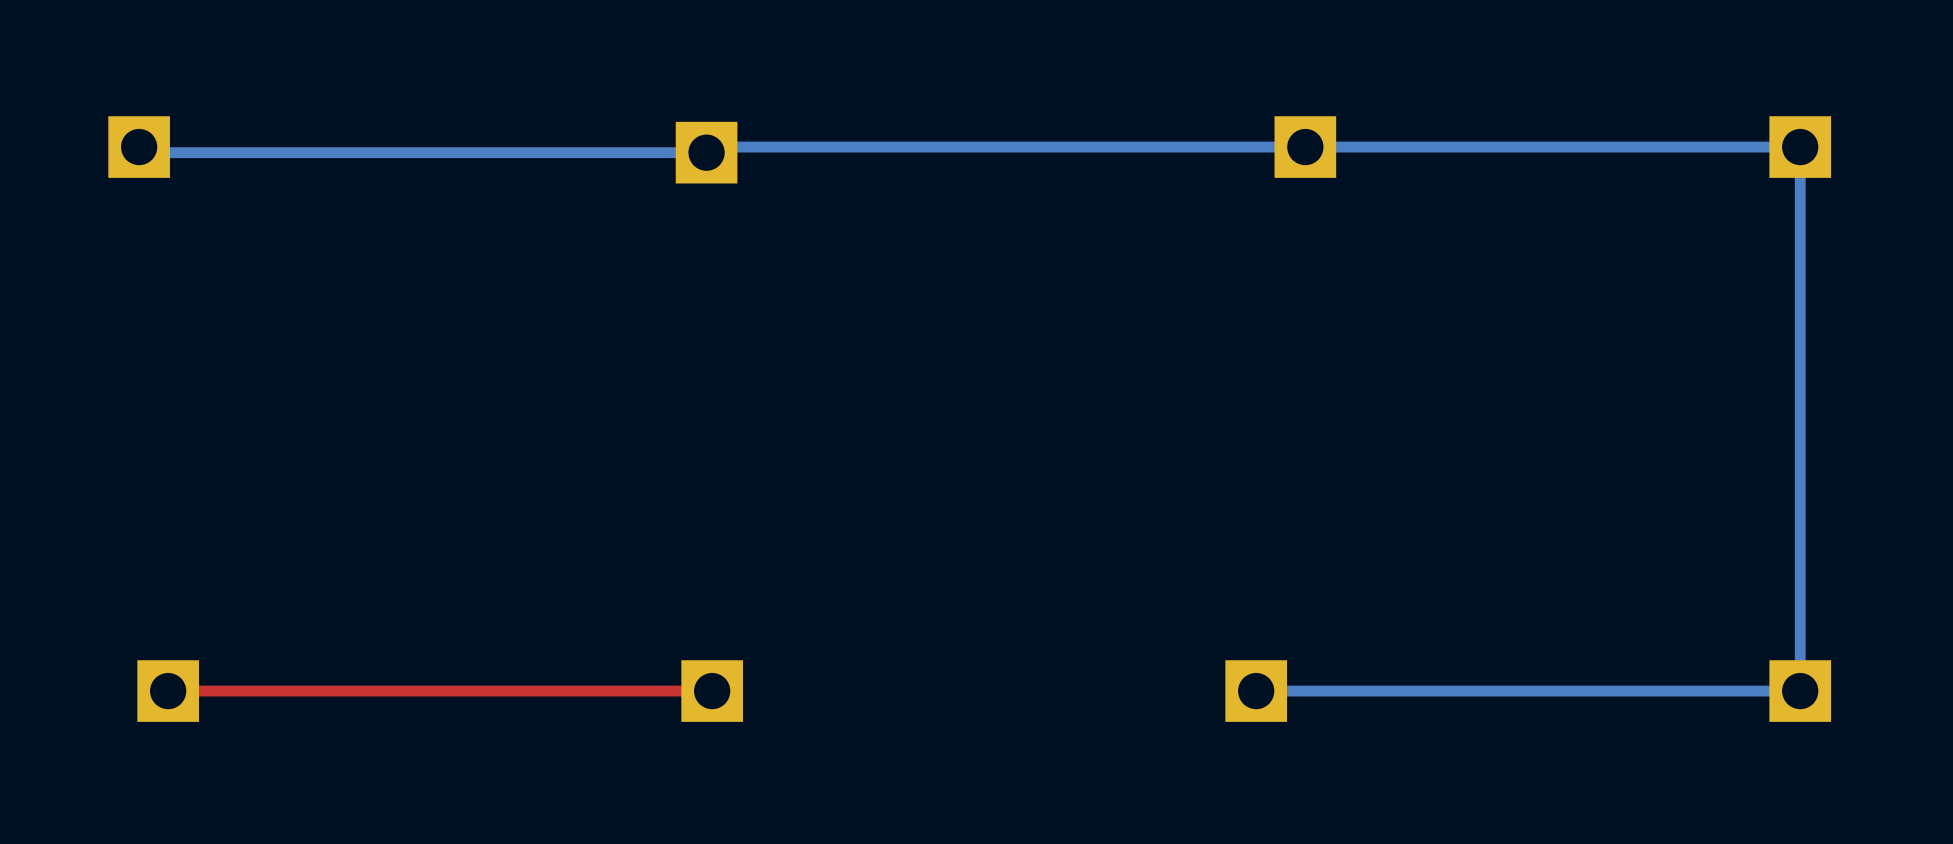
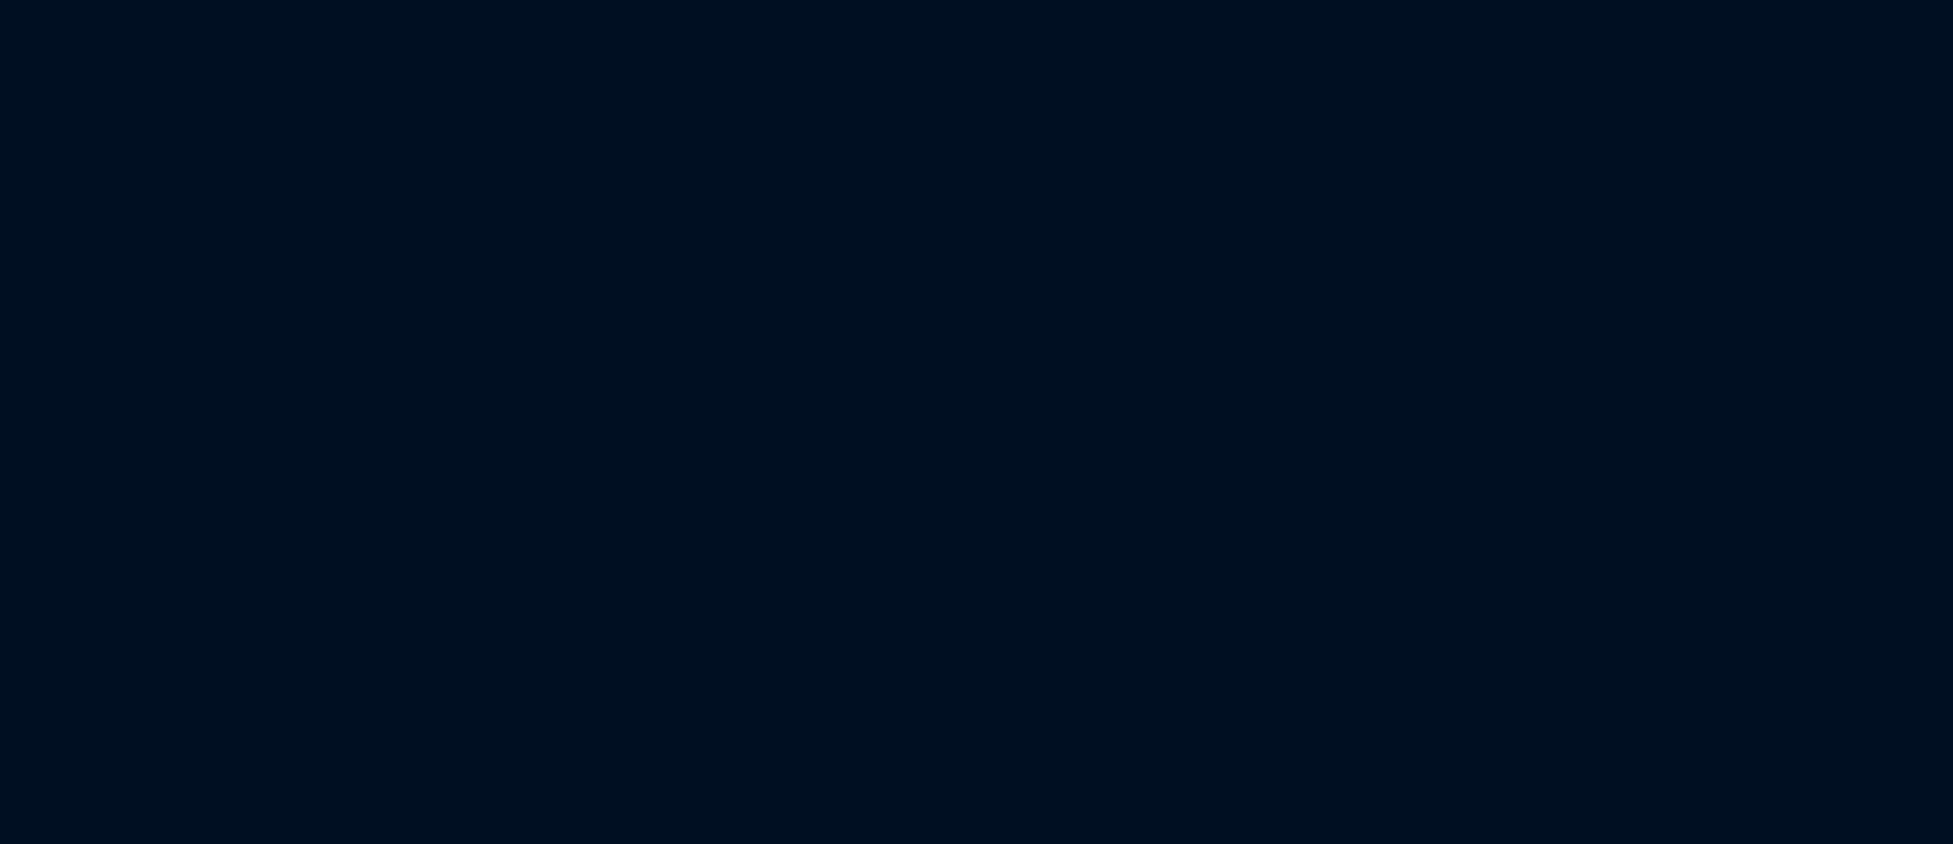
bottom track: (139, 147) (144, 152) (706, 152) (712, 147) (1800, 147) (1800, 691) (1256, 691) -> none
part: (139, 147) -> none
part: (1305, 147) -> none
part: (1800, 147) -> none
part: (706, 152) -> none
part: (168, 691) -> none
top track: (712, 691) (168, 691) -> none
part: (712, 691) -> none
part: (1256, 691) -> none
part: (1800, 691) -> none

